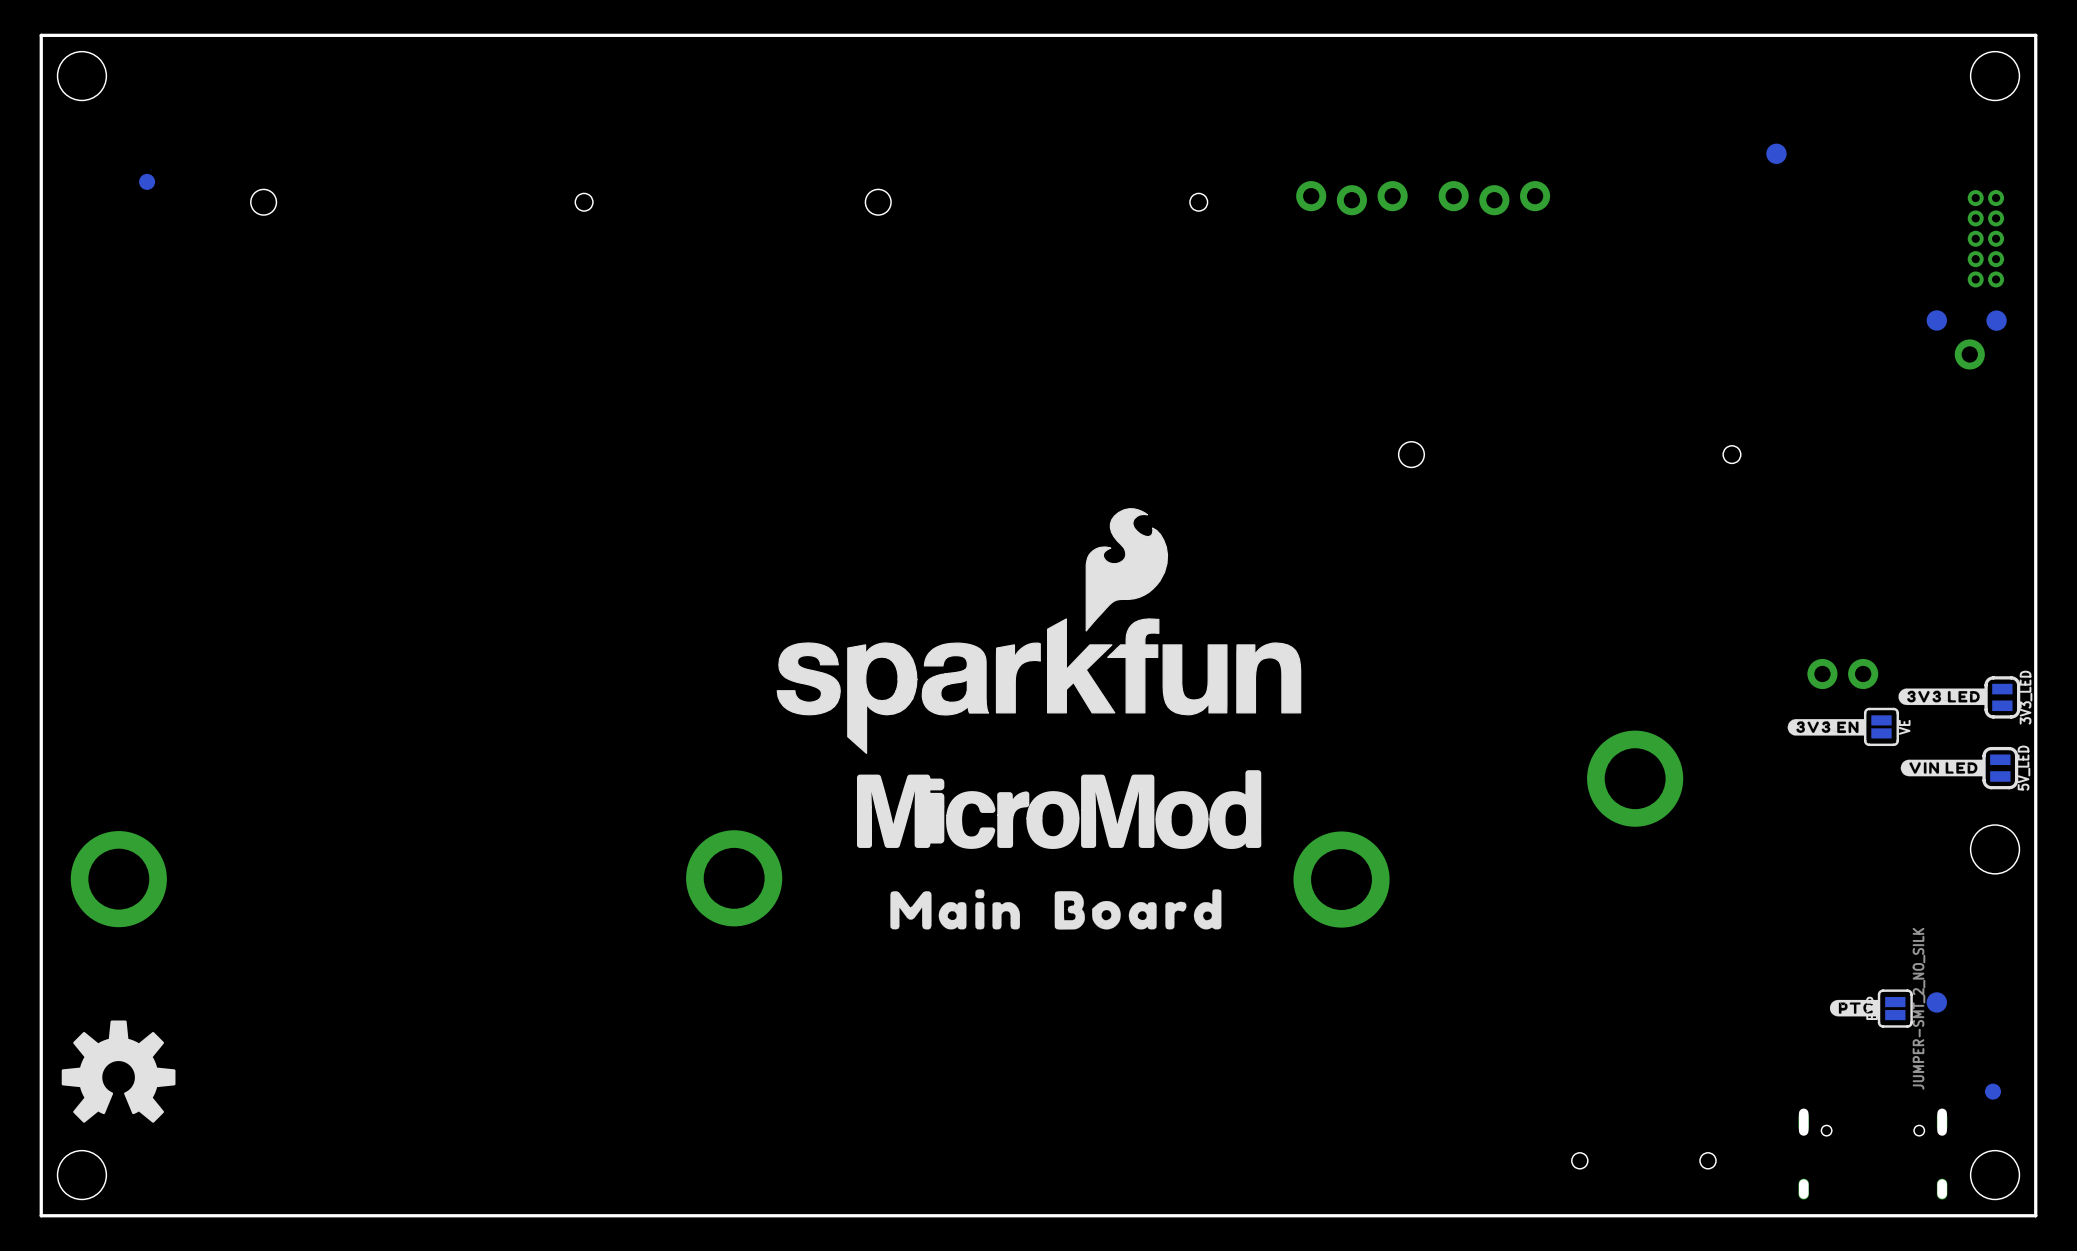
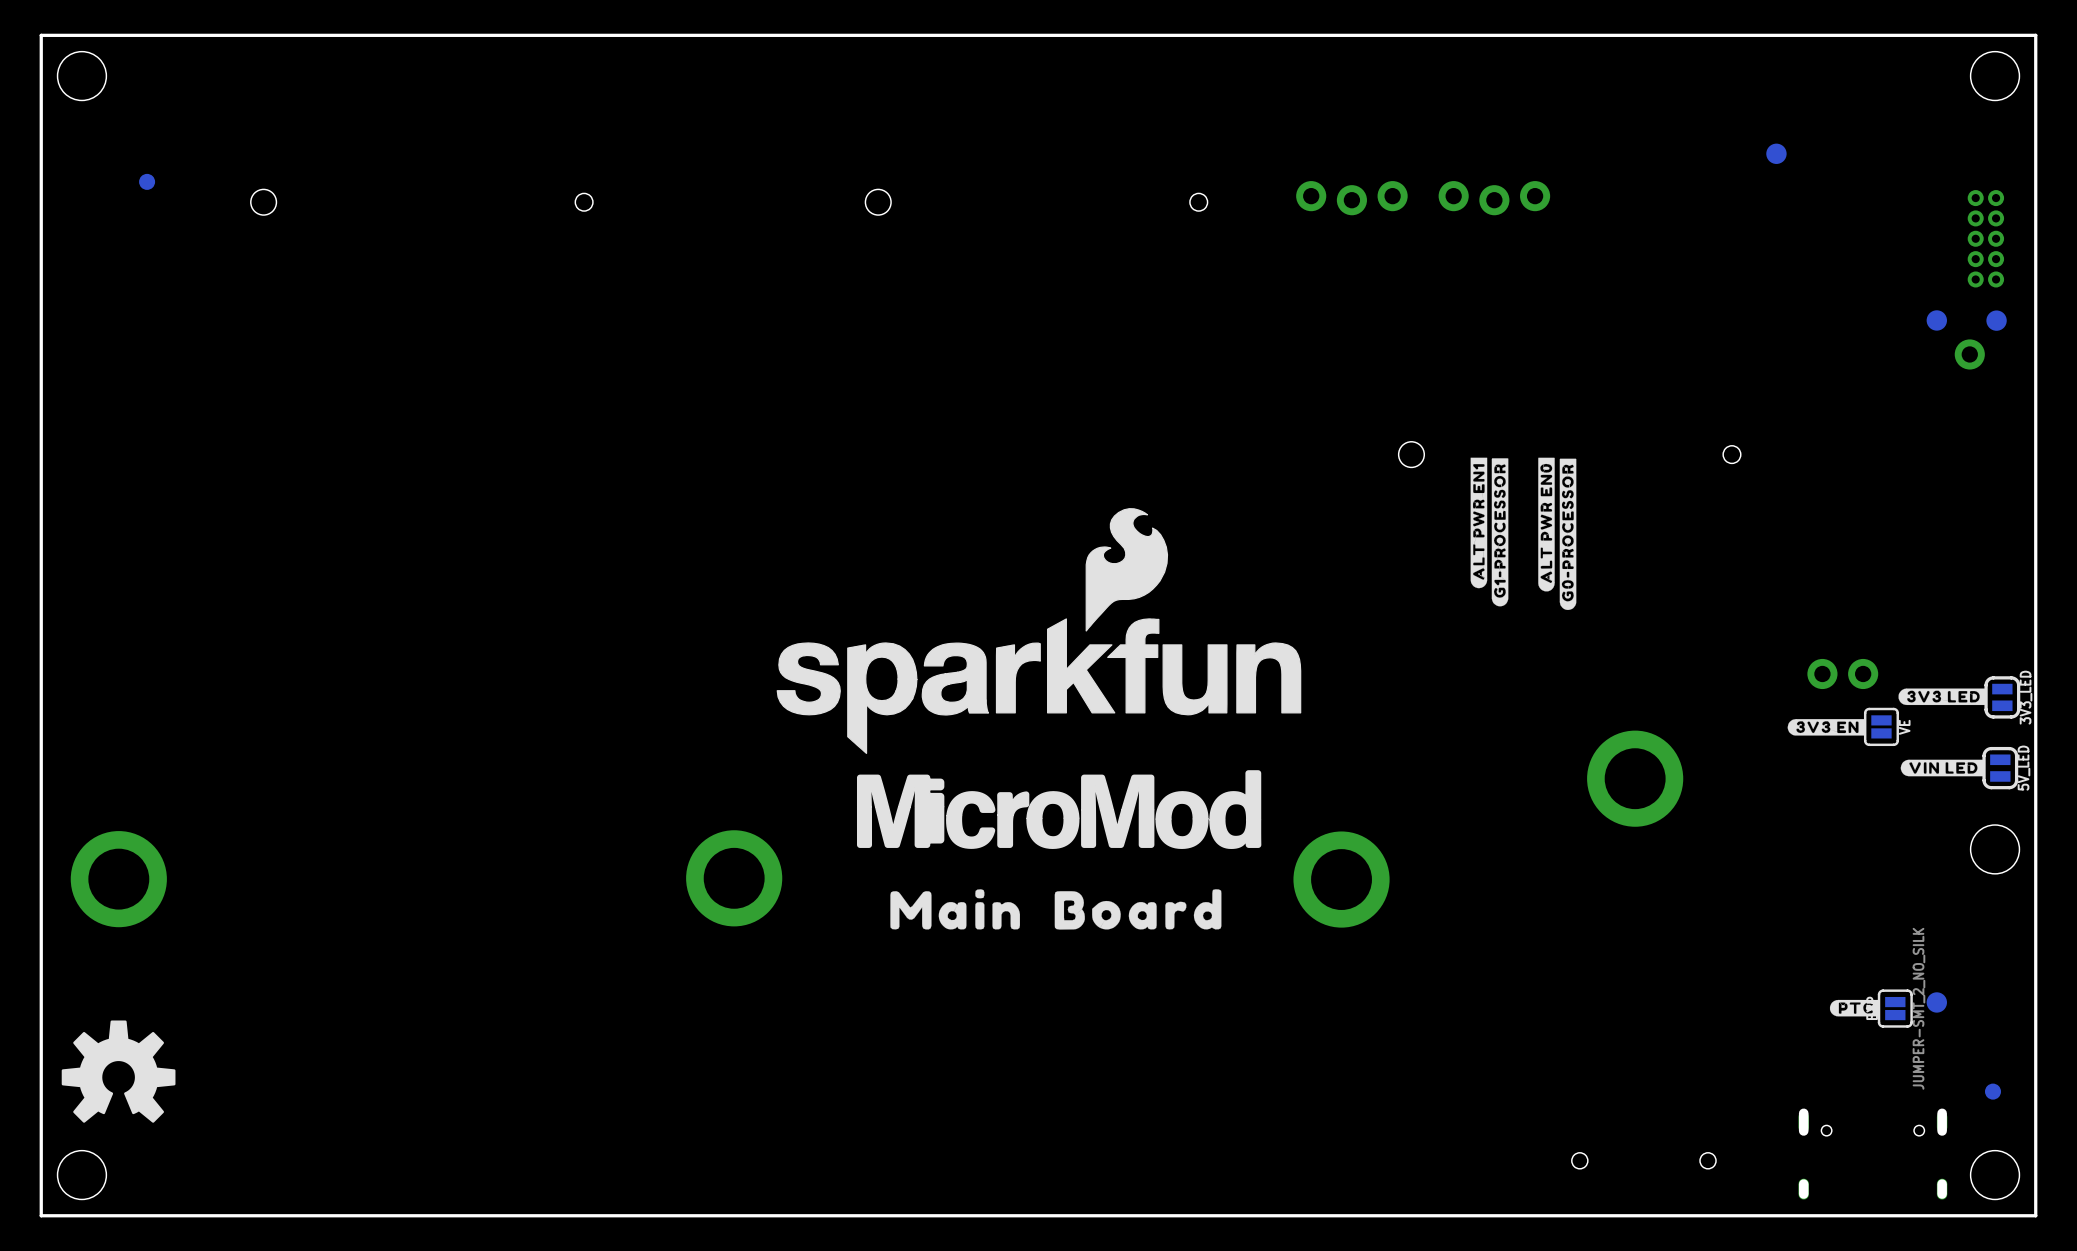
drawing: none -> [1470, 457, 1509, 607]
drawing: none -> [1538, 457, 1577, 610]

